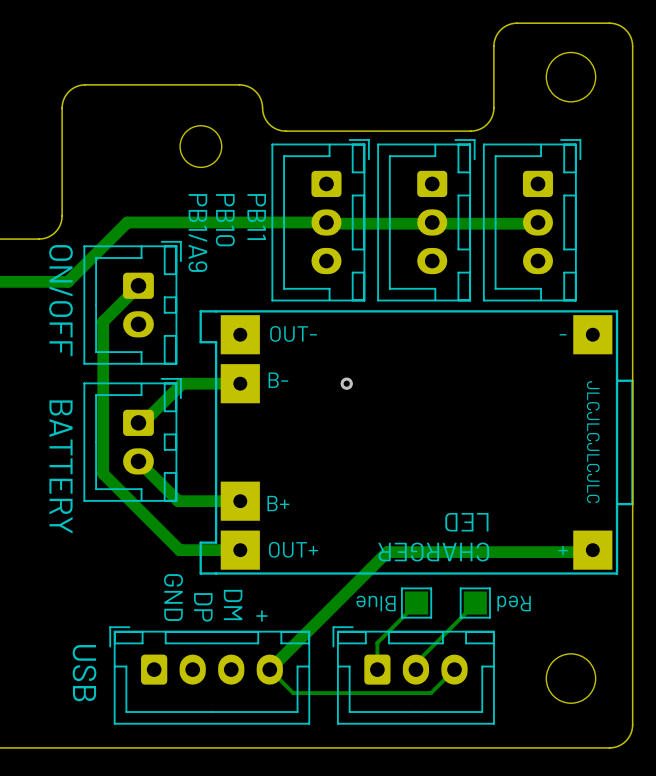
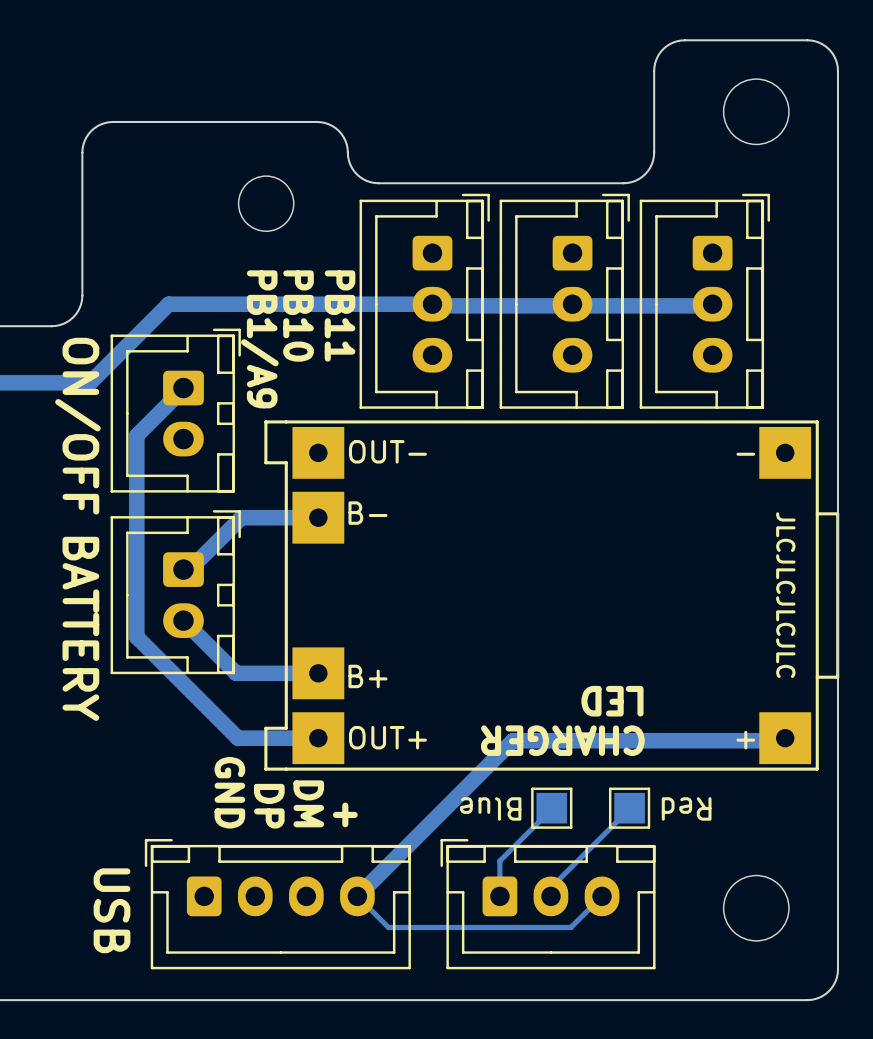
via: (346, 383) -> none

